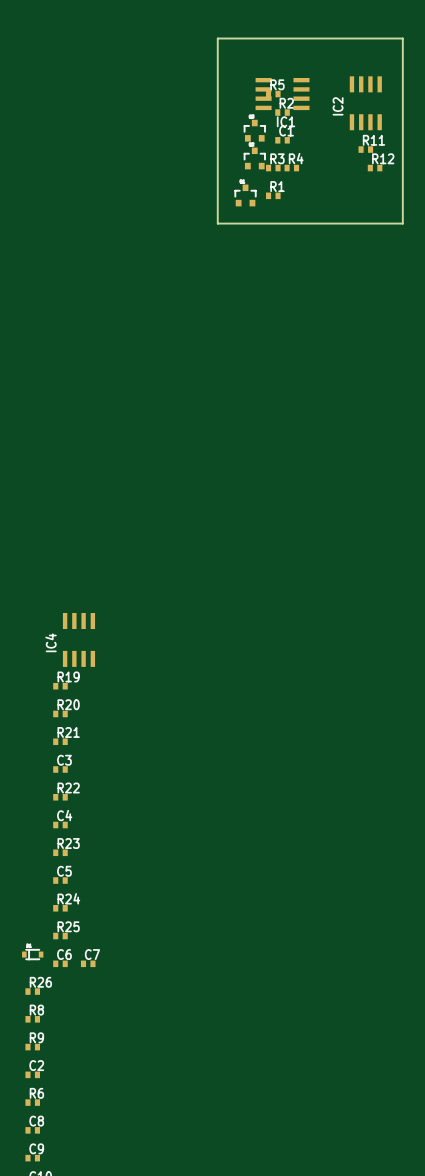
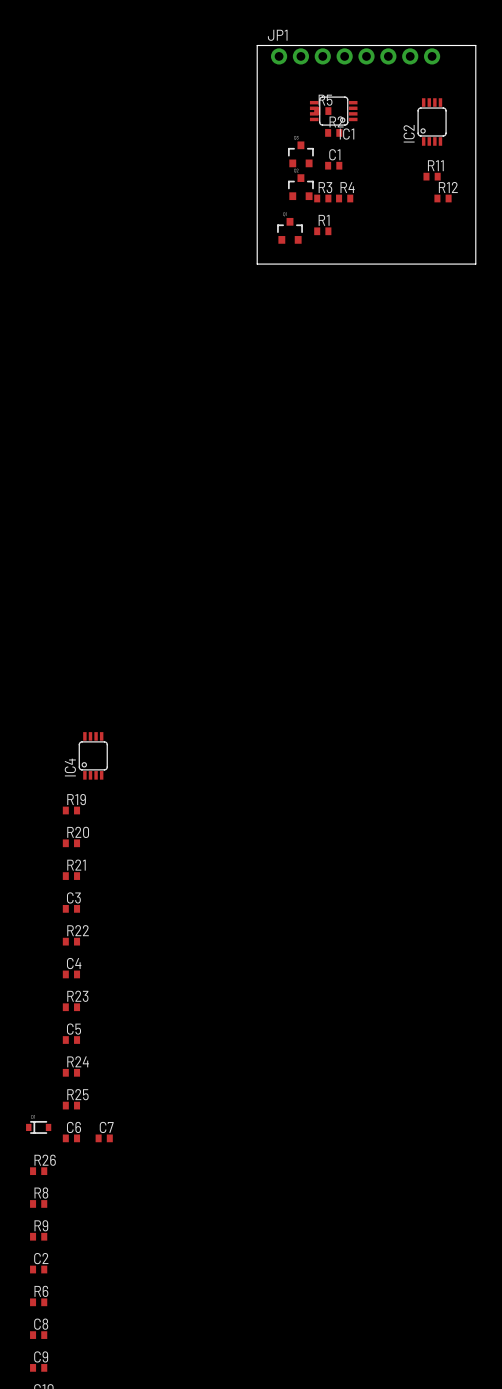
JP1: none -> (355, 56)
IC2 footprint: [349, 76, 382, 131] -> [417, 98, 447, 146]
IC1 footprint: [255, 77, 310, 111] -> [309, 96, 358, 126]
IC4 footprint: [62, 613, 96, 667] -> [78, 732, 108, 780]

